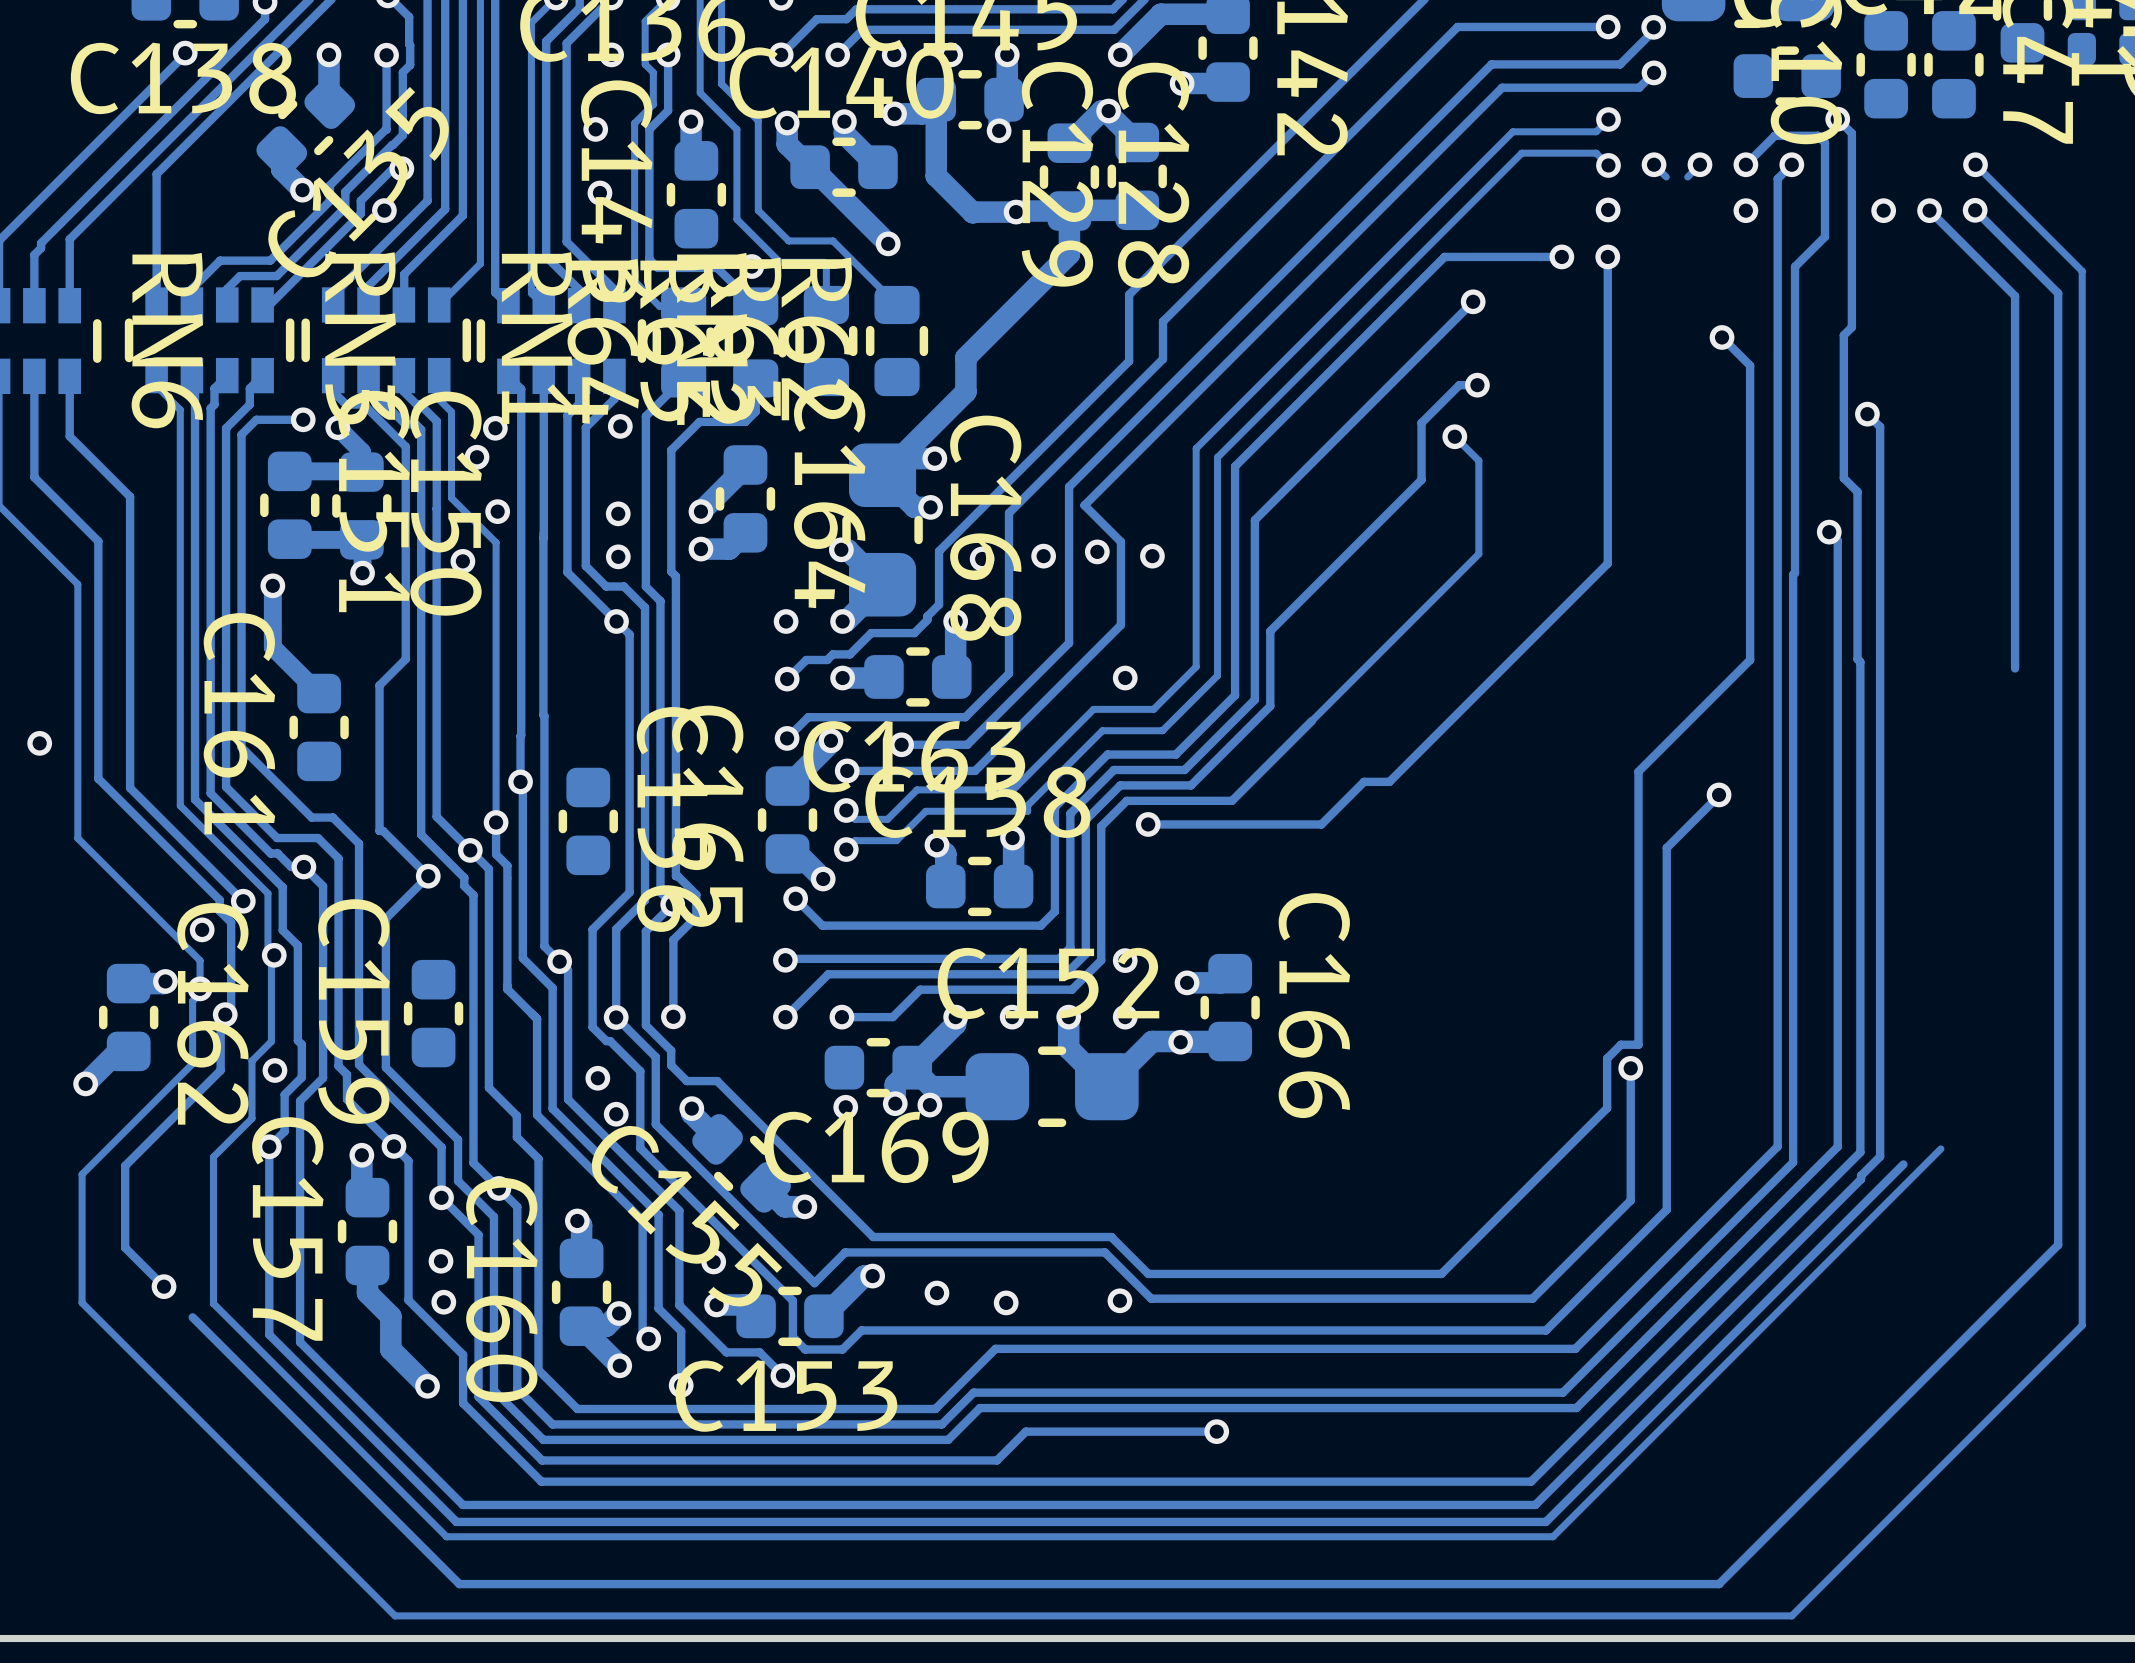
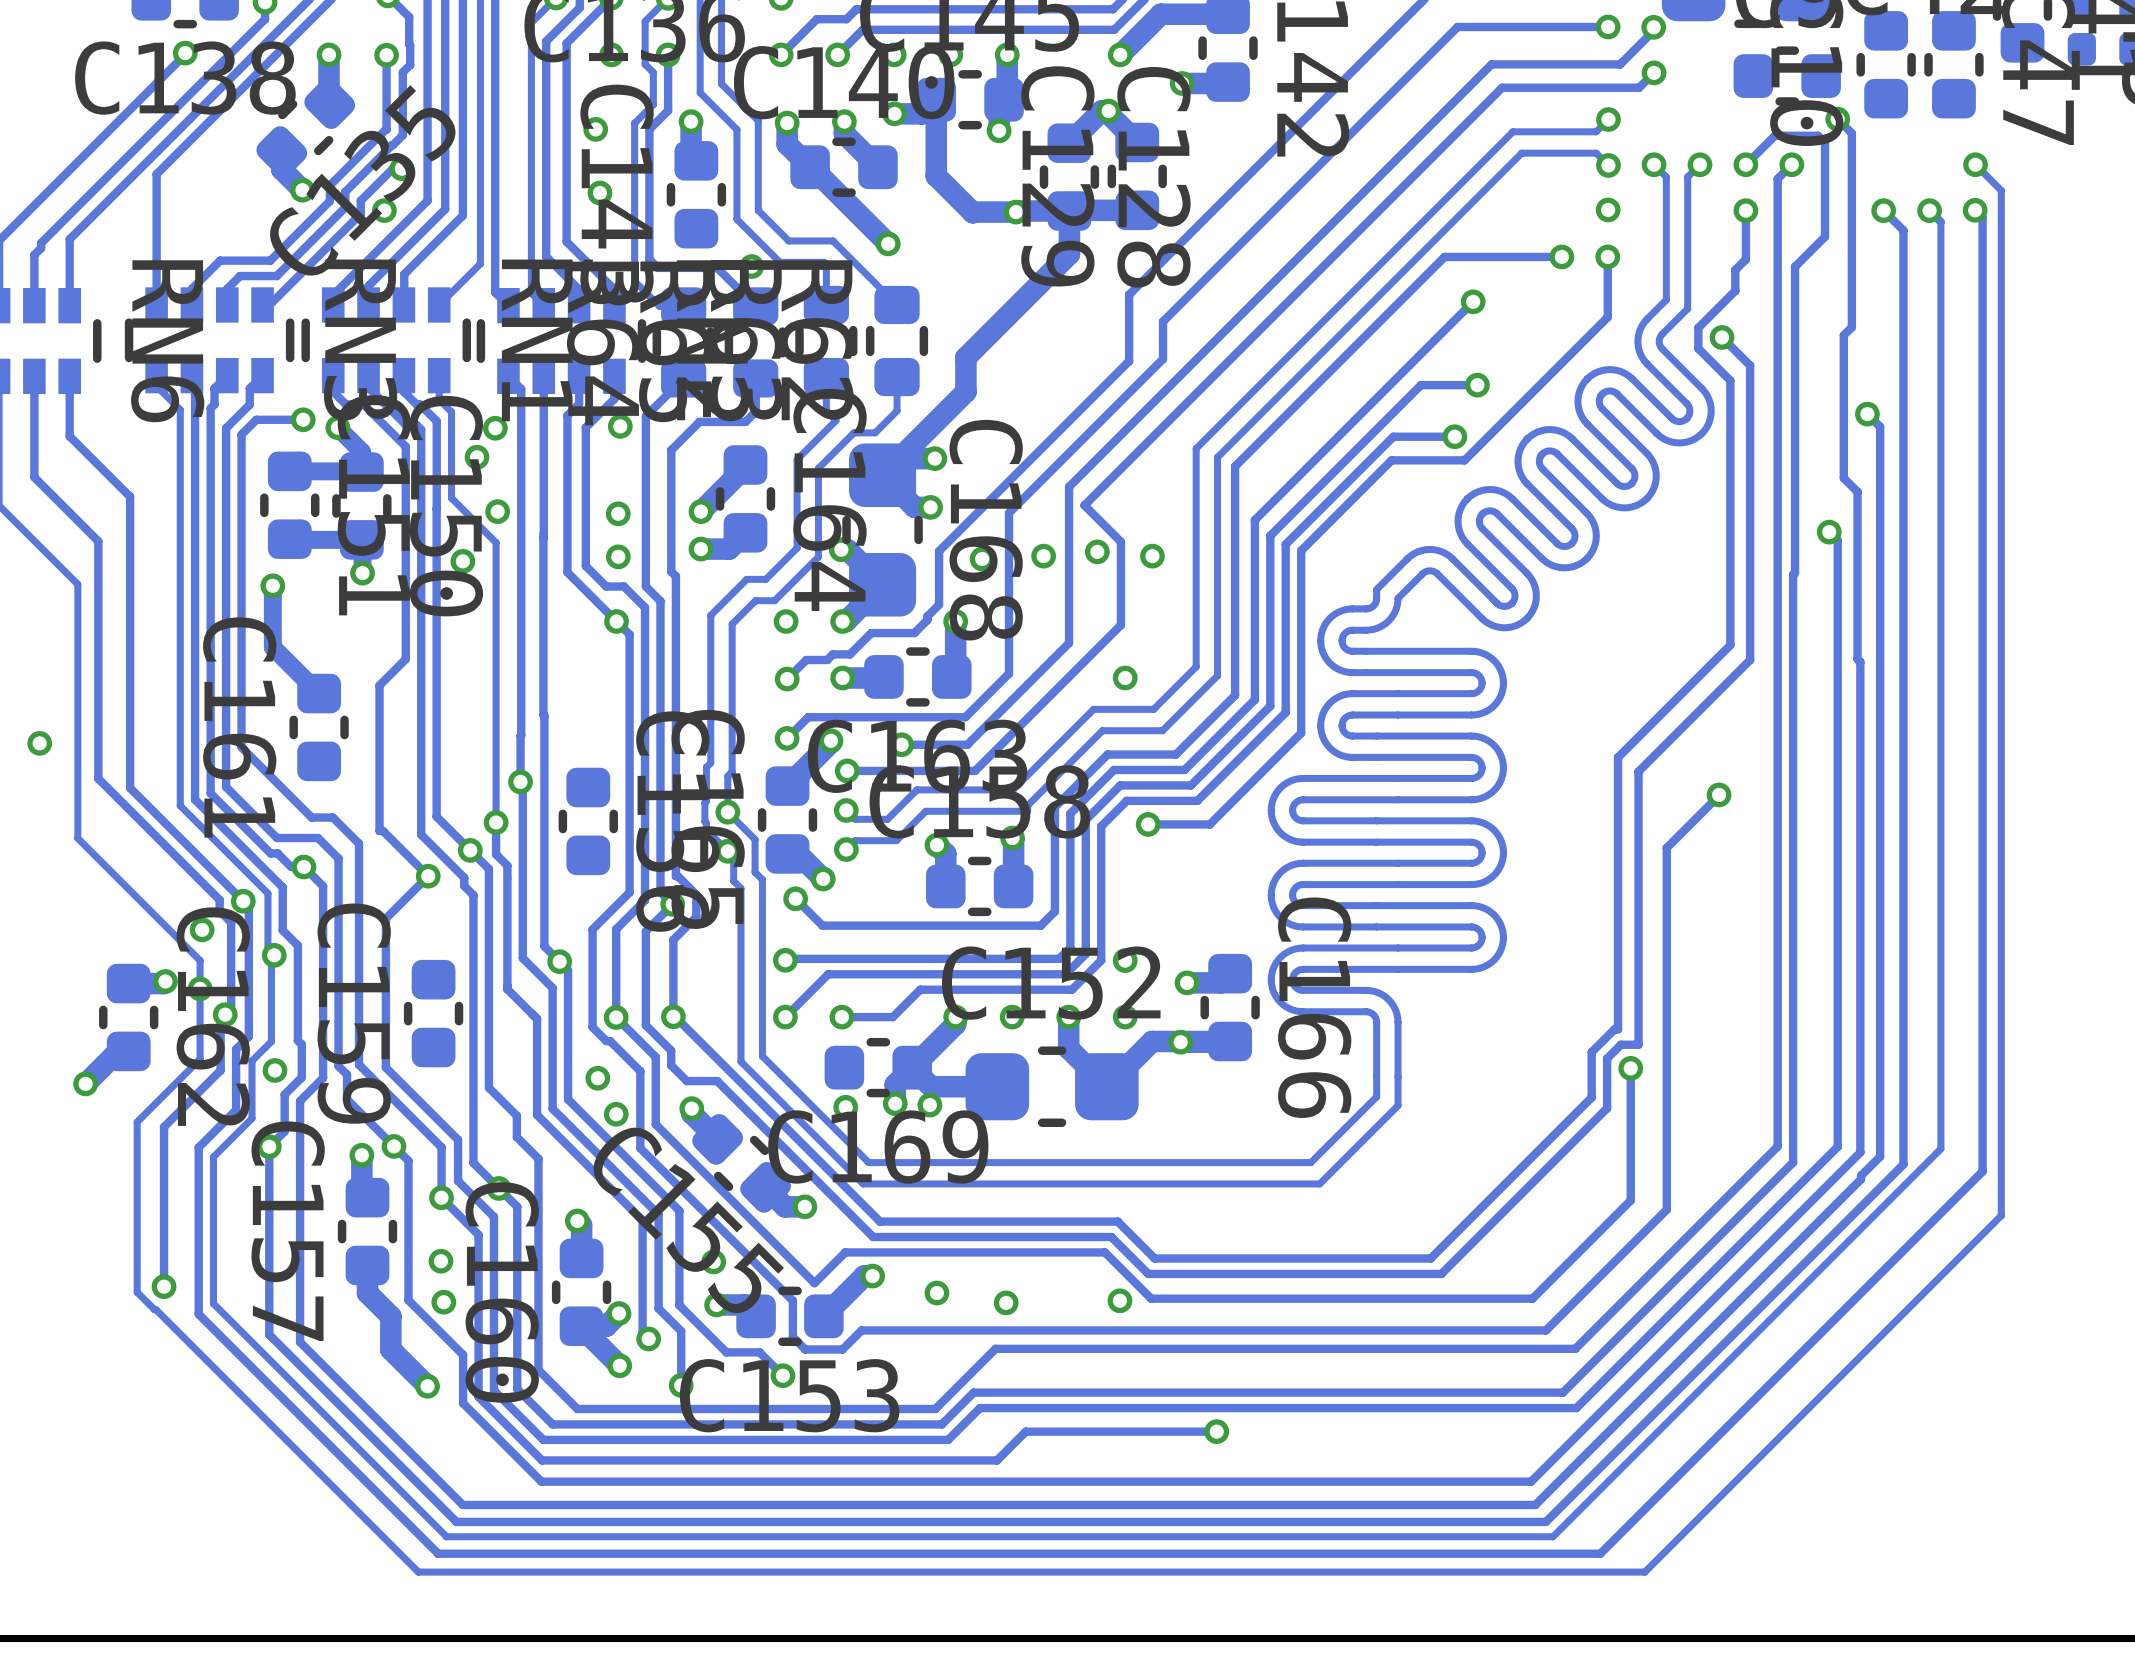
track: none -> (1666, 177) (1666, 299) (1642, 325) (1638, 337) (1638, 345) (1644, 360) (1688, 405) (1689, 412) (1687, 417) (1681, 421) (1673, 419) (1632, 378) (1621, 372) (1609, 369) (1593, 373) (1584, 382) (1580, 389) (1577, 401) (1580, 413) (1587, 424) (1632, 469) (1634, 476) (1631, 483) (1625, 486) (1618, 484) (1569, 436) (1558, 430) (1545, 429) (1533, 433) (1524, 442) (1518, 457) (1519, 469) (1527, 483) (1572, 529) (1574, 537) (1571, 543) (1565, 546) (1557, 544) (1512, 498) (1498, 490) (1485, 489) (1473, 493) (1467, 498) (1460, 509) (1458, 525) (1462, 537) (1512, 589) (1515, 595) (1511, 603) (1505, 606) (1498, 604) (1449, 556) (1438, 550) (1425, 549) (1410, 556) (1376, 589) (1376, 601) (1372, 606) (1338, 612) (1330, 618) (1322, 630) (1320, 644) (1323, 654) (1330, 663) (1342, 670) (1352, 672) (1472, 672) (1479, 675) (1482, 681) (1479, 689) (1472, 693) (1352, 693) (1338, 696) (1327, 705) (1320, 721) (1323, 739) (1332, 750) (1342, 755) (1352, 757) (1472, 757) (1480, 762) (1481, 770) (1477, 776) (1471, 778) (1303, 778) (1292, 780) (1280, 787) (1273, 799) (1272, 817) (1278, 830) (1289, 839) (1299, 841) (1472, 842) (1479, 846) (1482, 854) (1479, 860) (1471, 863) (1296, 864) (1283, 870) (1274, 881) (1271, 895) (1274, 908) (1283, 920) (1299, 926) (1471, 926) (1479, 930) (1482, 937) (1479, 944) (1471, 948) (1299, 948) (1286, 952) (1278, 960) (1272, 972) (1272, 986) (1276, 996) (1286, 1006) (1299, 1011) (1367, 1011) (1373, 1014) (1376, 1020) (1376, 1096) (1310, 1162) (868, 1162) (762, 1056) (762, 879) (755, 872) (755, 839) (727, 812) (727, 776) (732, 771) (732, 624) (755, 600) (774, 600) (818, 556) (818, 468) (853, 432) (875, 432) (897, 410) (897, 377)
track: none -> (1687, 177) (1687, 308) (1661, 335) (1659, 342) (1662, 348) (1706, 395) (1711, 411) (1708, 423) (1701, 433) (1695, 438) (1683, 442) (1671, 441) (1656, 433) (1615, 392) (1608, 391) (1602, 394)
track: (2001, 190) (2082, 271) (2082, 1325) (1791, 1615) (395, 1615) (82, 1302) (82, 1174) (192, 1063) (192, 1001) (200, 993) -> (2001, 190) (2001, 1215) (1644, 1572) (418, 1572) (155, 1309)
track: none -> (1745, 210) (1745, 259) (1735, 270) (1735, 290) (1698, 327) (1698, 348) (1730, 380) (1730, 645) (1618, 757) (1618, 1029) (1614, 1029) (1591, 1052) (1591, 1097) (1430, 1258) (1154, 1258) (1117, 1221) (879, 1221) (673, 1016)
track: none -> (1883, 210) (1903, 230) (1903, 1164)
track: (1982, 217) (2058, 293) (2058, 1244) (1719, 1584) (459, 1584) (192, 1317) -> (1982, 217) (1982, 1171) (1600, 1553) (438, 1553) (198, 1314) (198, 1147) (236, 1110) (236, 1049) (248, 1036) (248, 906) (243, 901)
track: (1940, 221) (2015, 296) (2015, 668) -> (1940, 221) (1940, 1148)
track: (1607, 317) (1607, 563) (1389, 781) (1364, 781) (1321, 824) (1209, 824) -> (1607, 317) (1464, 460) (1391, 460) (1301, 550) (1301, 733) (1209, 824)
track: none -> (826, 377) (826, 410) (836, 420) (797, 459) (797, 548) (765, 579) (746, 579) (710, 615) (710, 762) (706, 767) (704, 821) (706, 829) (727, 851) (733, 851) (733, 881) (740, 888) (740, 1061) (863, 1183) (1319, 1183) (1398, 1105) (1397, 1018) (1391, 1002) (1379, 993) (1369, 990) (1300, 990) (1293, 983) (1294, 974) (1303, 969) (1478, 968) (1491, 962) (1500, 951) (1503, 937) (1500, 923) (1488, 910) (1475, 905) (1301, 905) (1294, 900) (1293, 891) (1297, 885) (1303, 884) (1478, 883) (1491, 877) (1498, 869) (1503, 856) (1501, 842) (1491, 827) (1475, 821) (1301, 820) (1294, 815) (1292, 807) (1296, 801) (1303, 799) (1475, 799) (1488, 794) (1498, 784) (1503, 771) (1501, 757) (1494, 745) (1482, 737) (1471, 736) (1351, 735) (1344, 731) (1342, 725) (1344, 719) (1351, 715) (1471, 715) (1485, 711) (1496, 703) (1502, 690) (1501, 672) (1494, 660) (1485, 654) (1475, 651) (1351, 651) (1344, 647) (1342, 639) (1348, 631) (1373, 629) (1386, 623) (1394, 612) (1398, 598) (1422, 573) (1428, 570) (1436, 573) (1481, 618) (1492, 625) (1508, 627) (1516, 625) (1527, 618) (1535, 604) (1536, 591) (1533, 583) (1527, 573) (1481, 527) (1479, 521) (1482, 513) (1489, 510) (1496, 513) (1541, 558) (1556, 566) (1572, 566) (1583, 561) (1592, 551) (1596, 540) (1595, 527) (1589, 516) (1540, 466) (1539, 460) (1542, 453)
track: (1459, 385) (1421, 422) (1421, 479) (1270, 631) -> (1459, 385) (1420, 385) (1270, 535) (1270, 631)
track: none -> (1602, 394) (1599, 401) (1601, 407) (1646, 453) (1653, 463) (1656, 476) (1655, 484) (1646, 498) (1632, 506) (1624, 507) (1612, 505) (1601, 498) (1556, 453) (1548, 450) (1542, 453)
track: (1454, 436) (1478, 460) (1478, 554) (1232, 800) (1197, 800) -> (1454, 436) (1393, 436) (1285, 544) (1285, 712) (1197, 800)
via: none -> (727, 812)
via: none -> (727, 851)
track: none -> (200, 993) (200, 1059) (137, 1122) (137, 1292) (154, 1309)
track: (164, 1126) (125, 1165) (125, 1247) (164, 1286) -> (164, 1126) (164, 1286)

